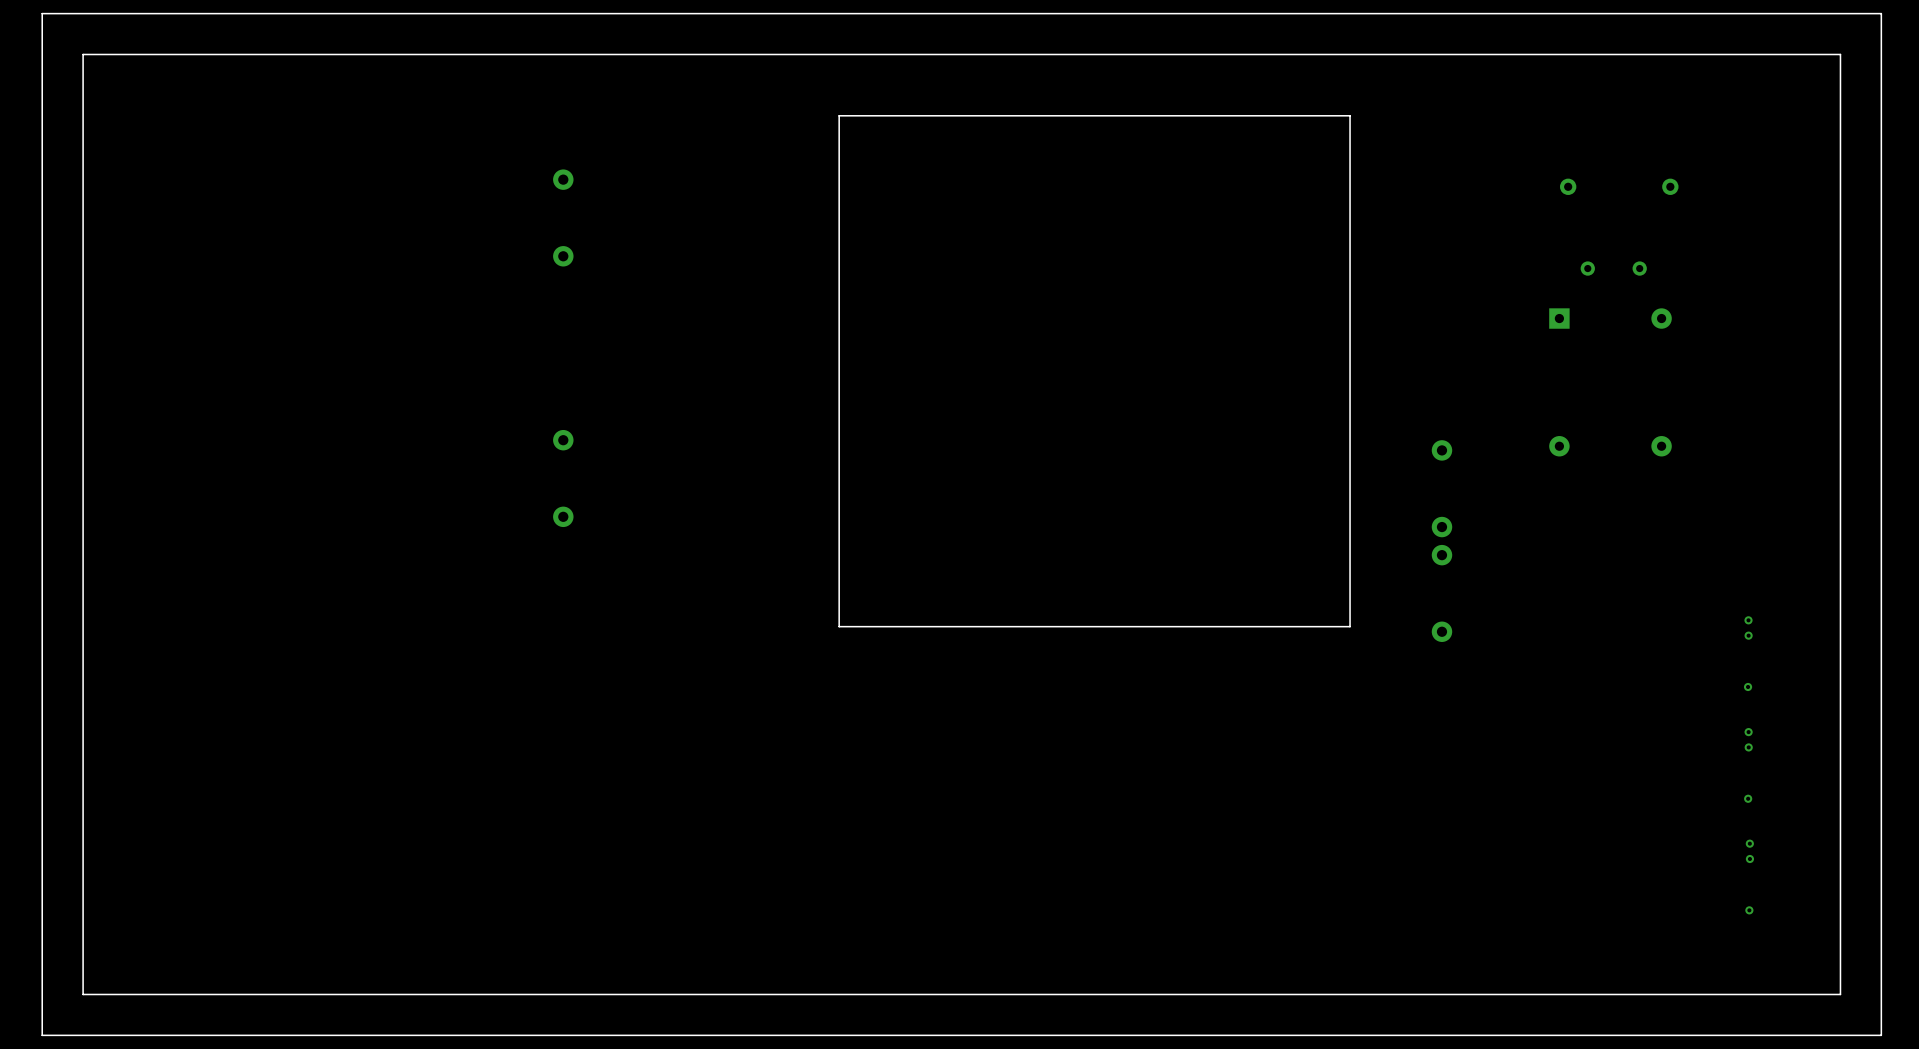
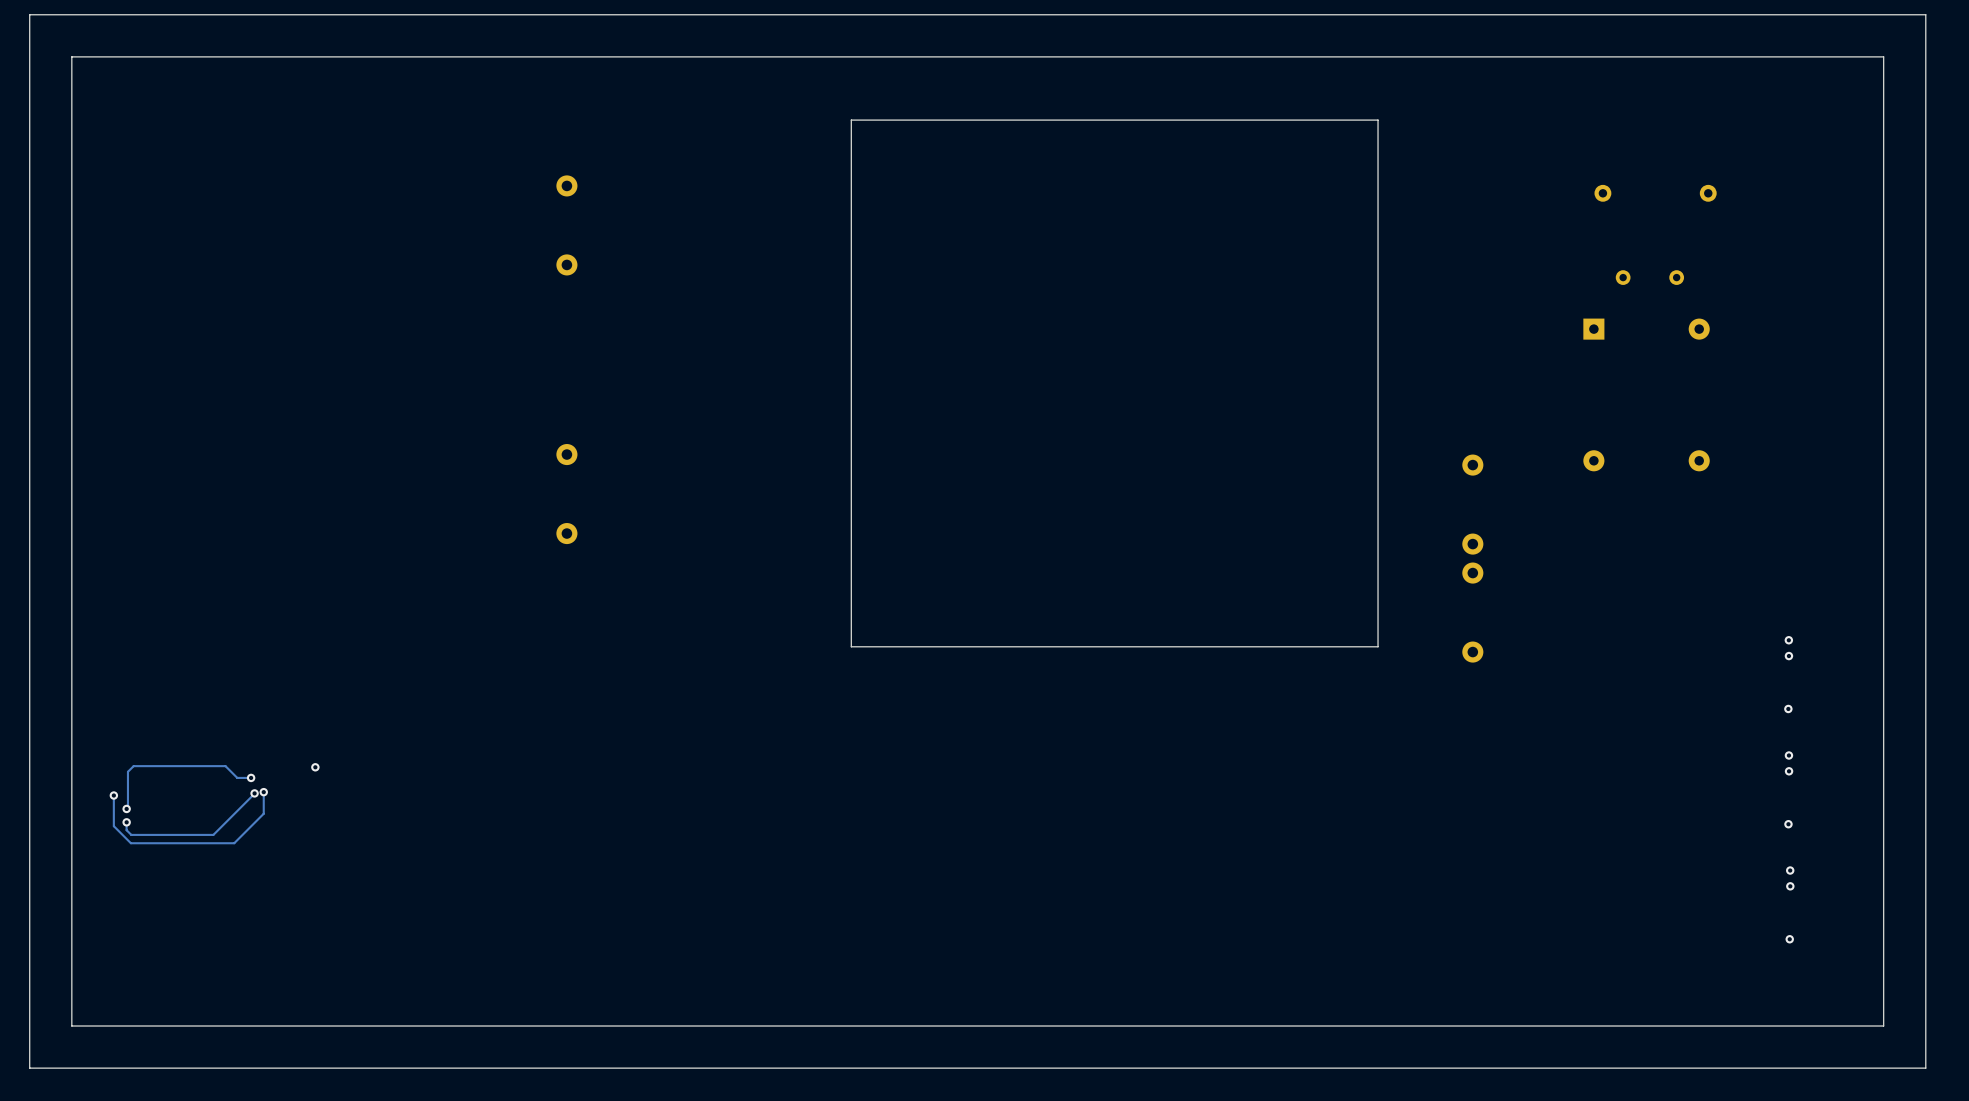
via: none -> (315, 767)
track: none -> (251, 777) (237, 777) (225, 766) (133, 766) (127, 771) (126, 808)
via: none -> (251, 777)
track: none -> (263, 792) (263, 813) (234, 843) (130, 843) (113, 826) (113, 795)
via: none -> (263, 792)
track: none -> (254, 793) (213, 834) (131, 834) (126, 830) (126, 822)
via: none -> (254, 793)
via: none -> (113, 795)
via: none -> (126, 808)
via: none -> (126, 822)

